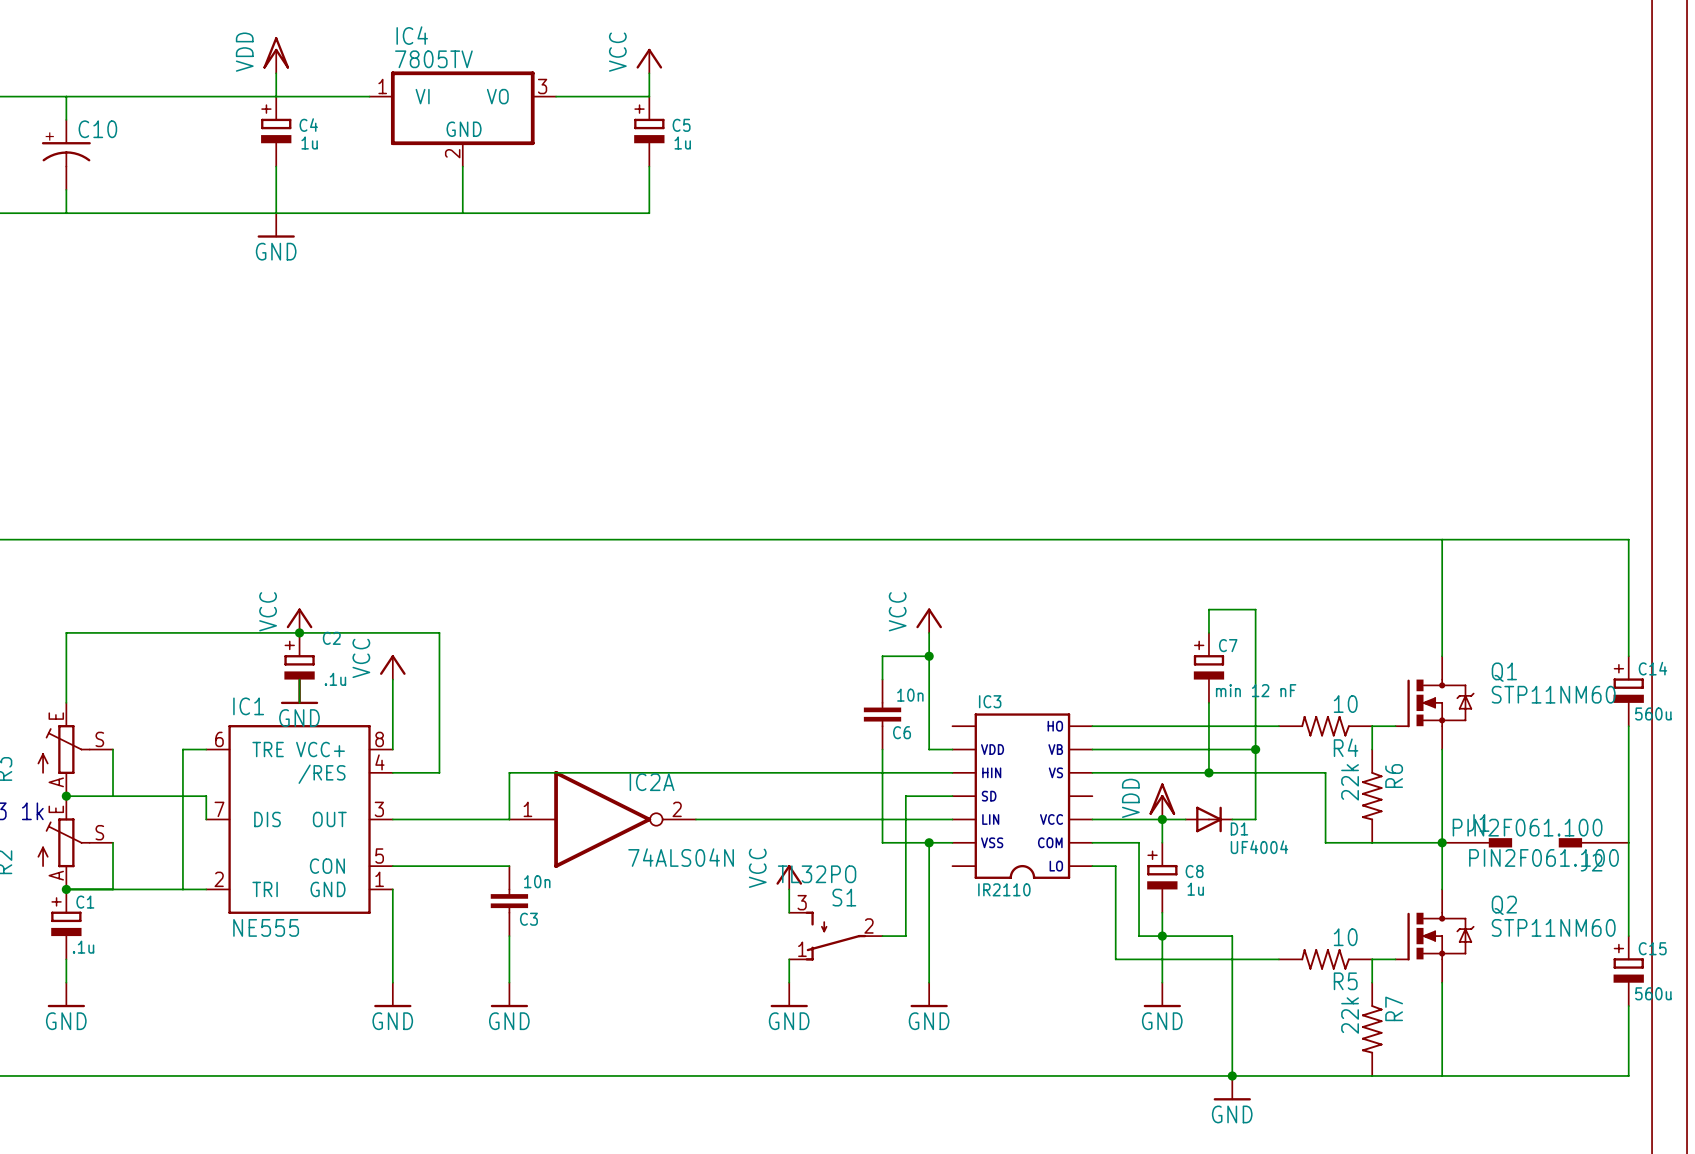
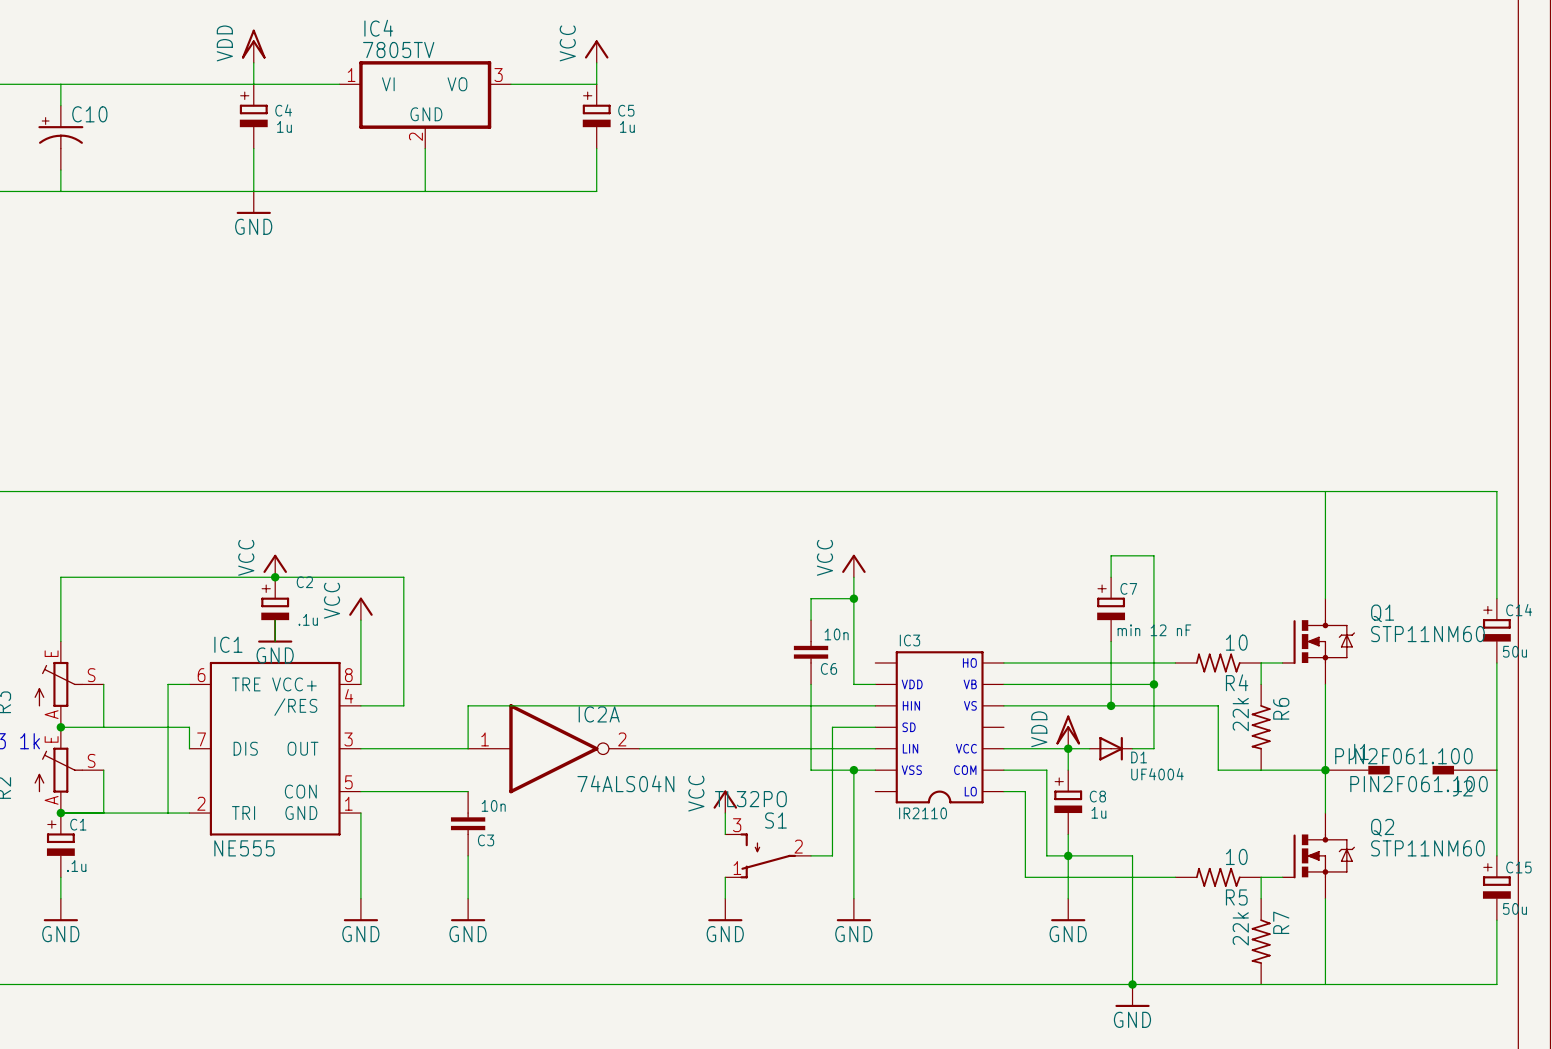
C14 value: 560u (1653, 713) -> 50u (1514, 651)
C15 value: 560u (1653, 993) -> 50u (1514, 908)

